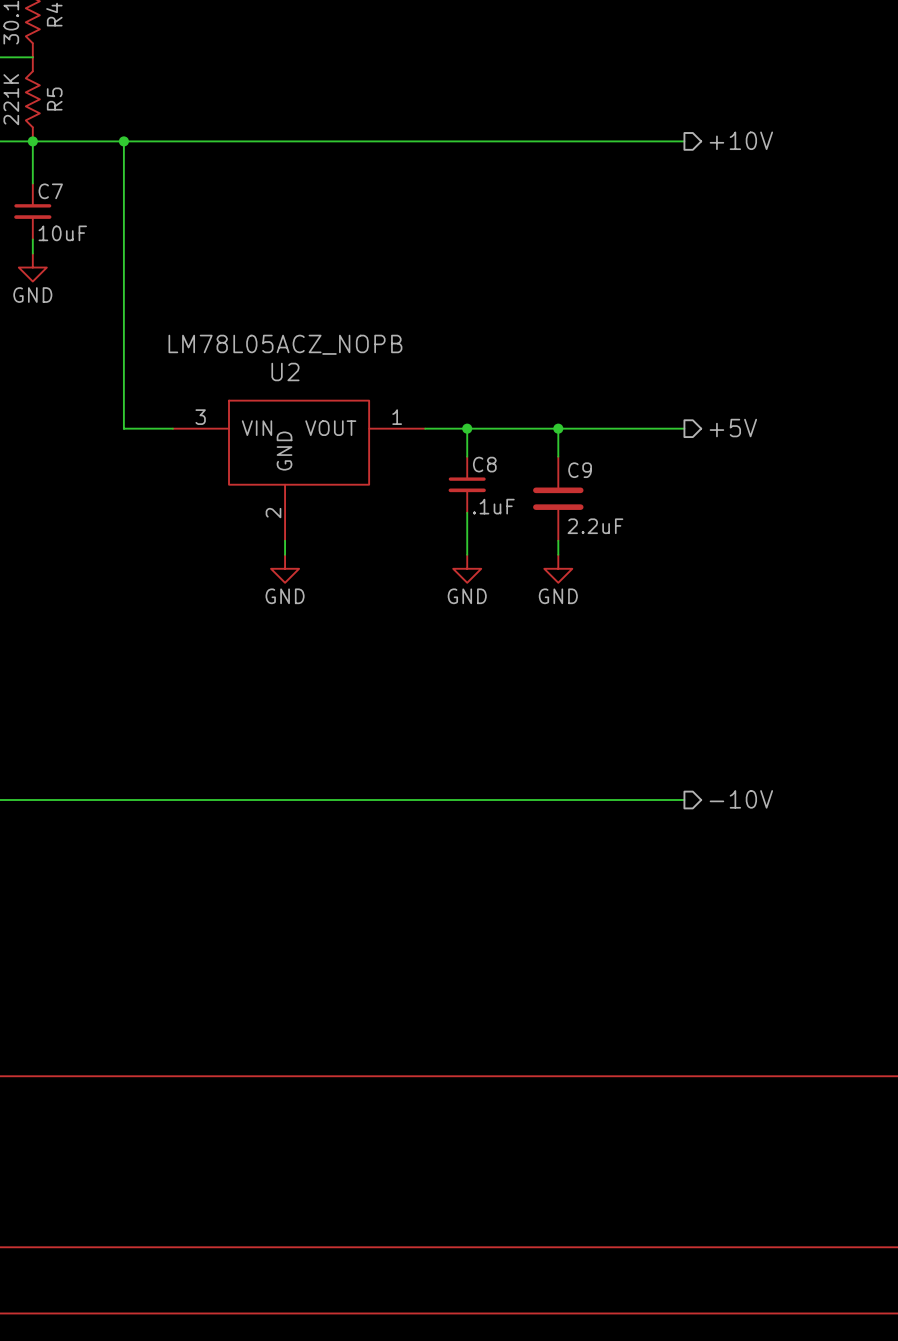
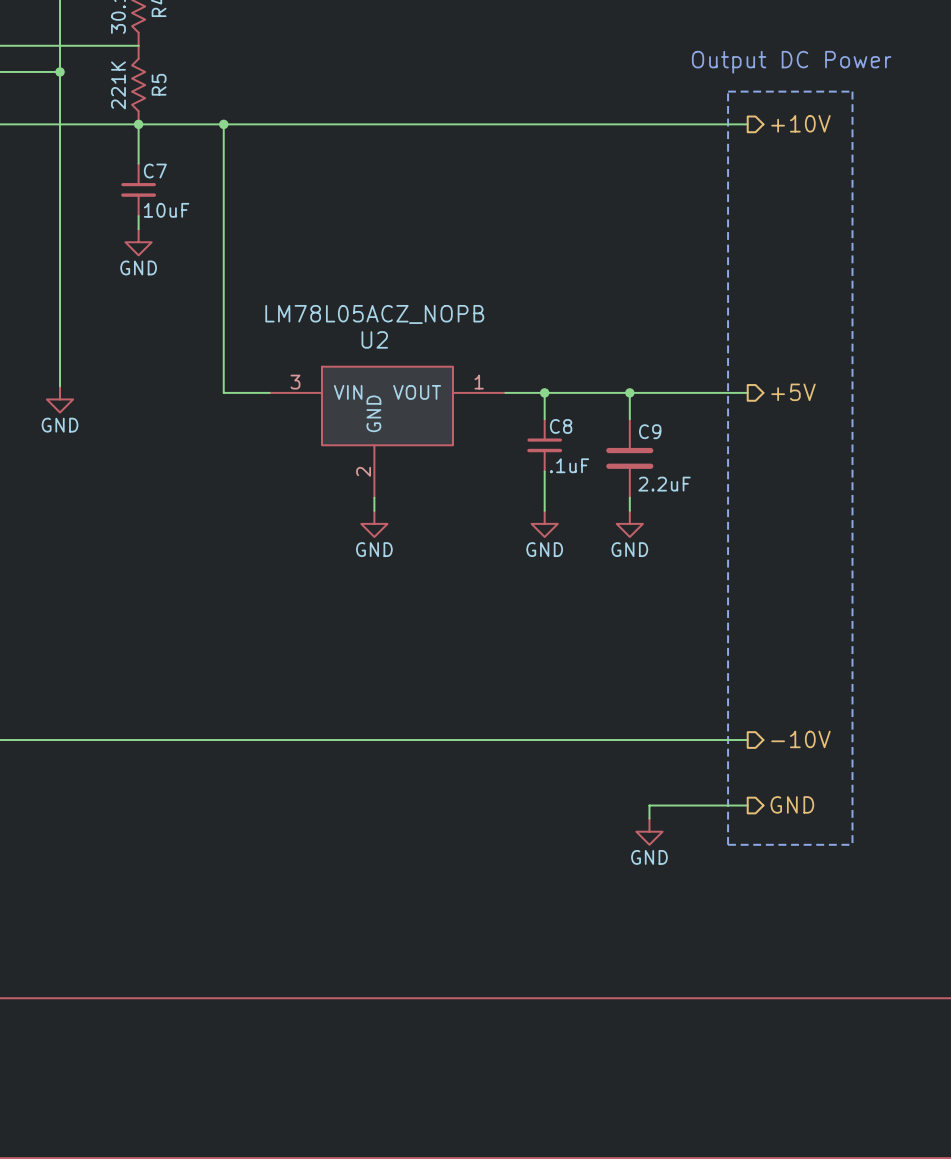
text: none -> Output DC Power (791, 62)
line: none -> (728, 91) (728, 844) (852, 844) (852, 91) (728, 91)
hierarchical label: none -> GND (792, 804)
wire: none -> (747, 805) (649, 805) (649, 818)
power symbol: none -> GND (649, 831)

